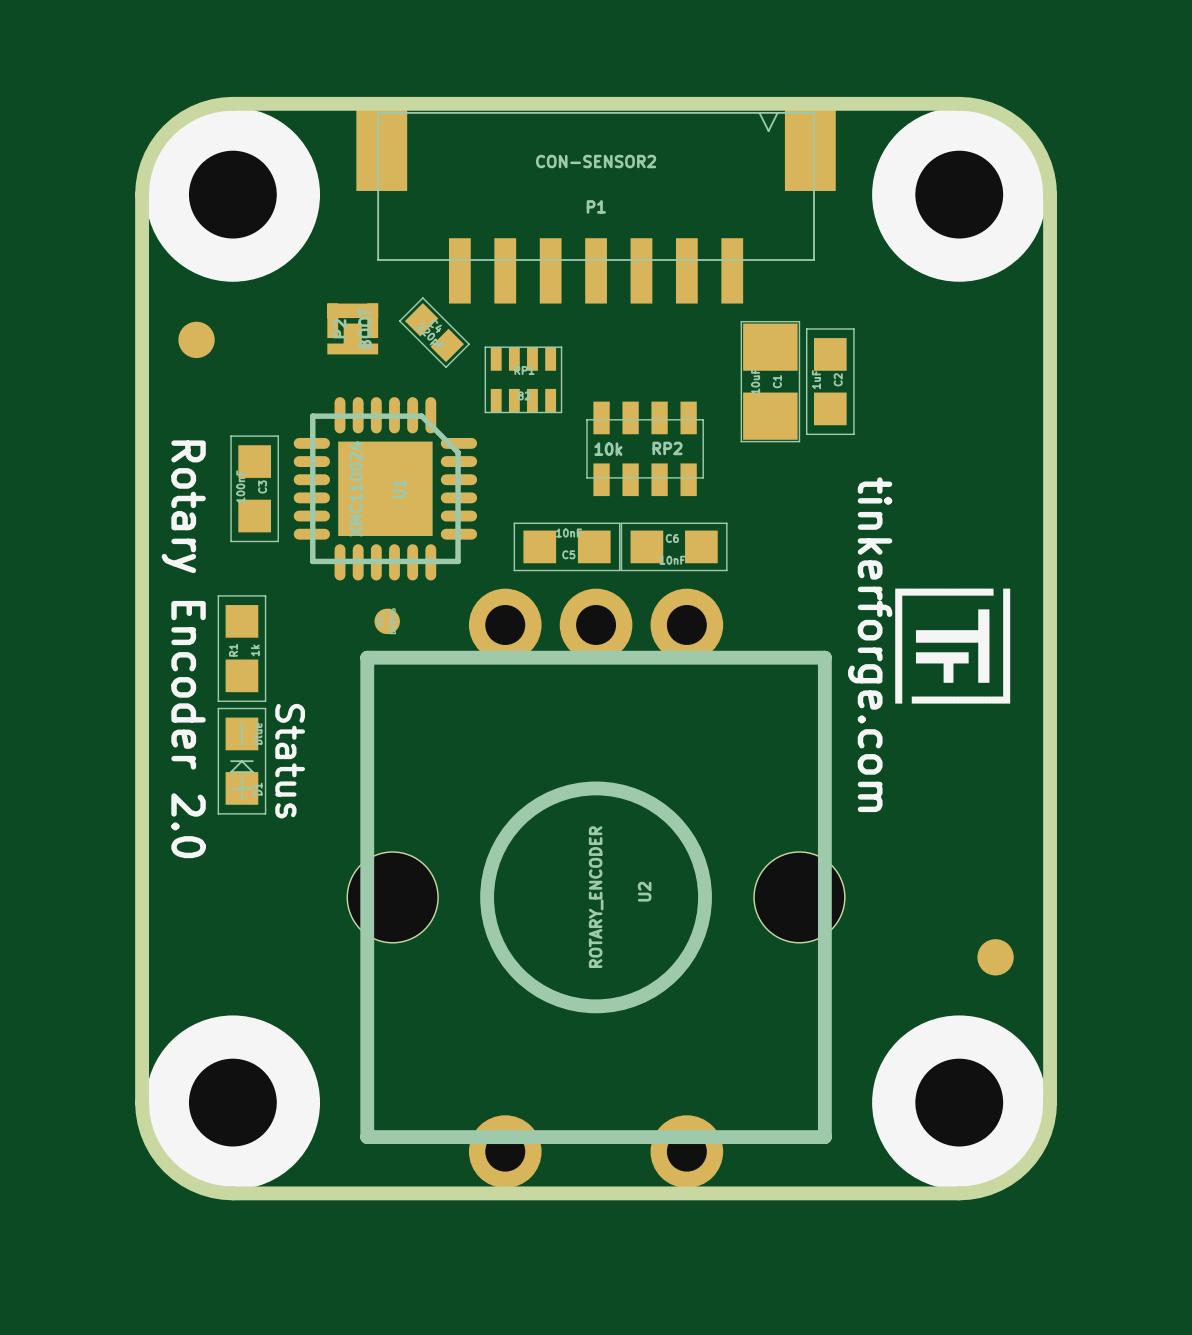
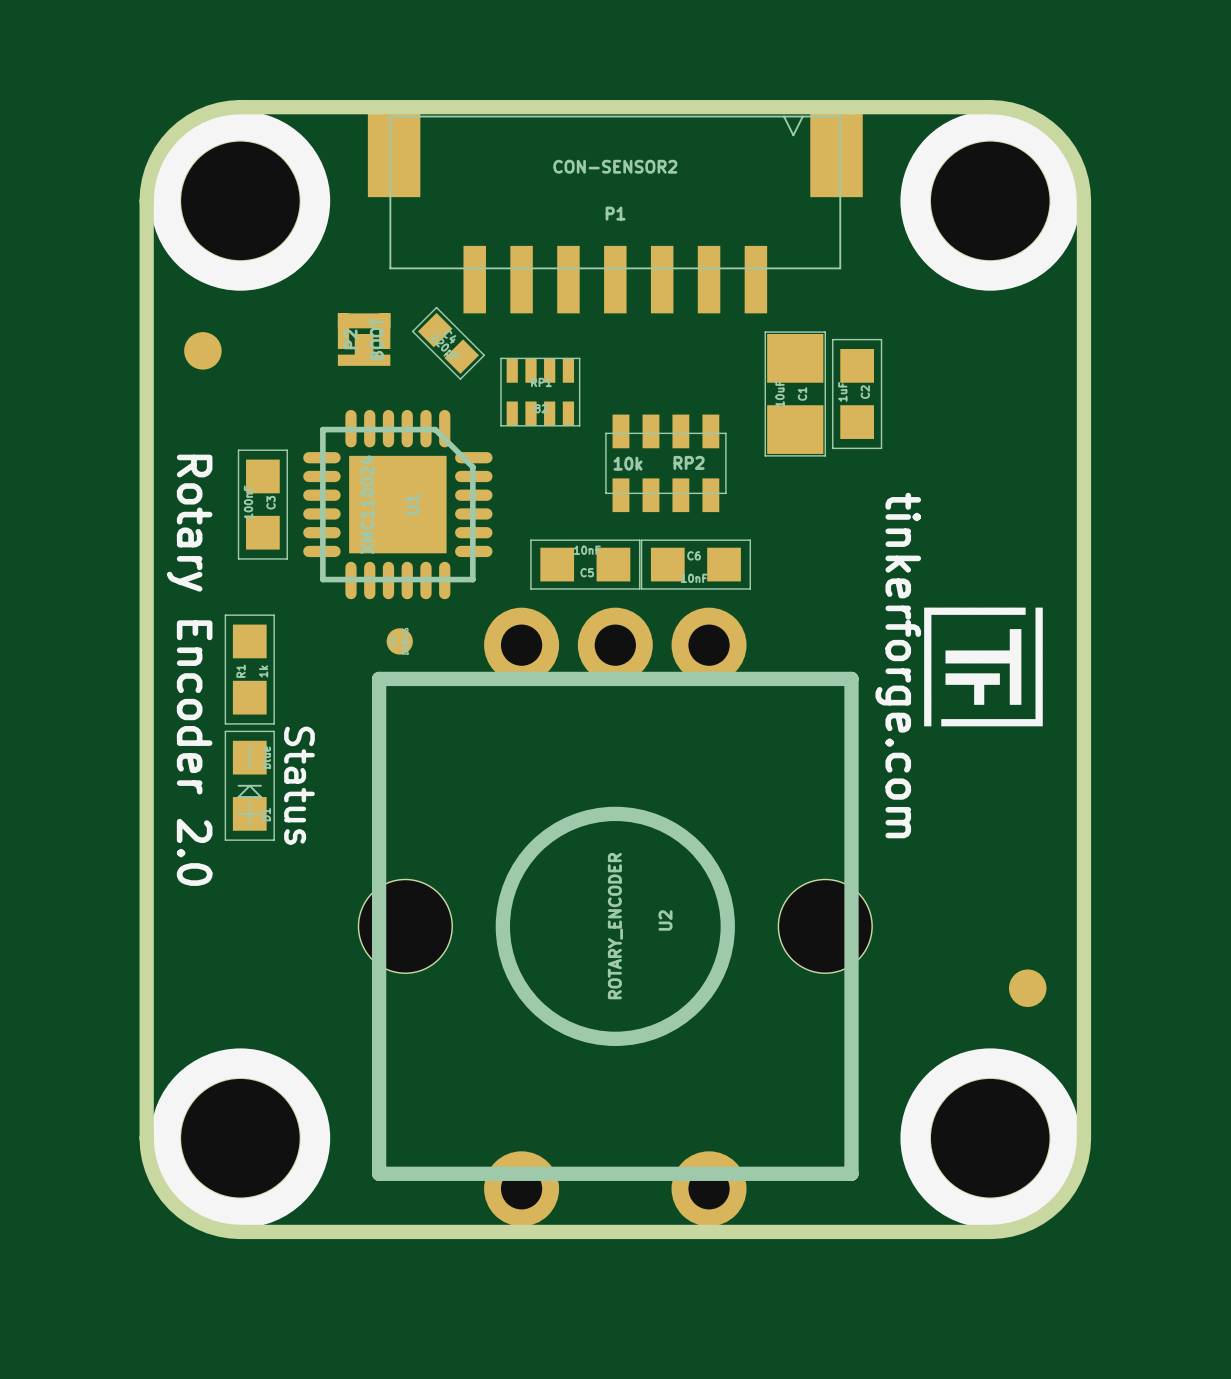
part footprint: [145, 107, 321, 282] -> [150, 111, 331, 291]
part footprint: [872, 107, 1047, 282] -> [900, 111, 1081, 291]
part footprint: [145, 1015, 321, 1190] -> [150, 1048, 331, 1228]
part footprint: [872, 1015, 1047, 1190] -> [900, 1048, 1081, 1228]

